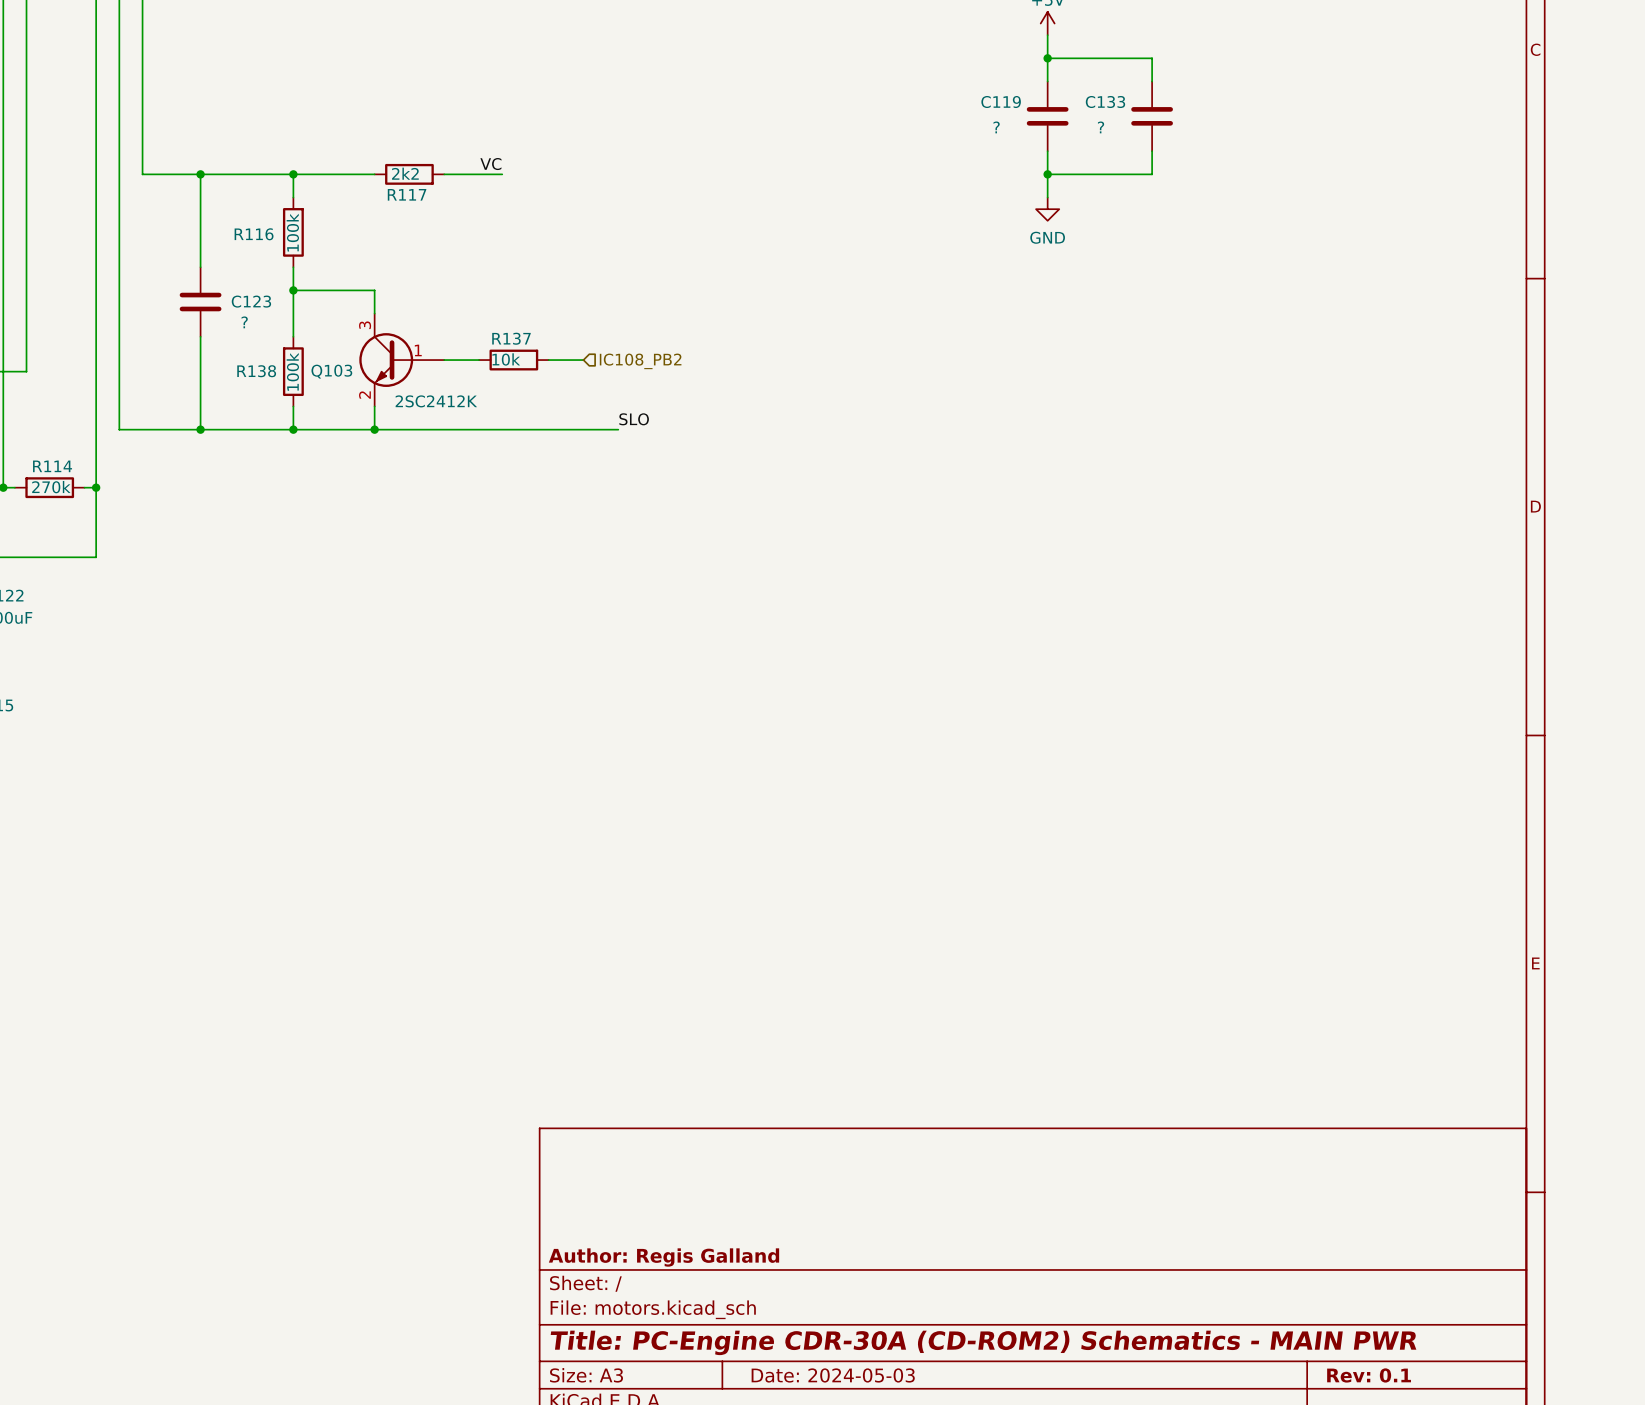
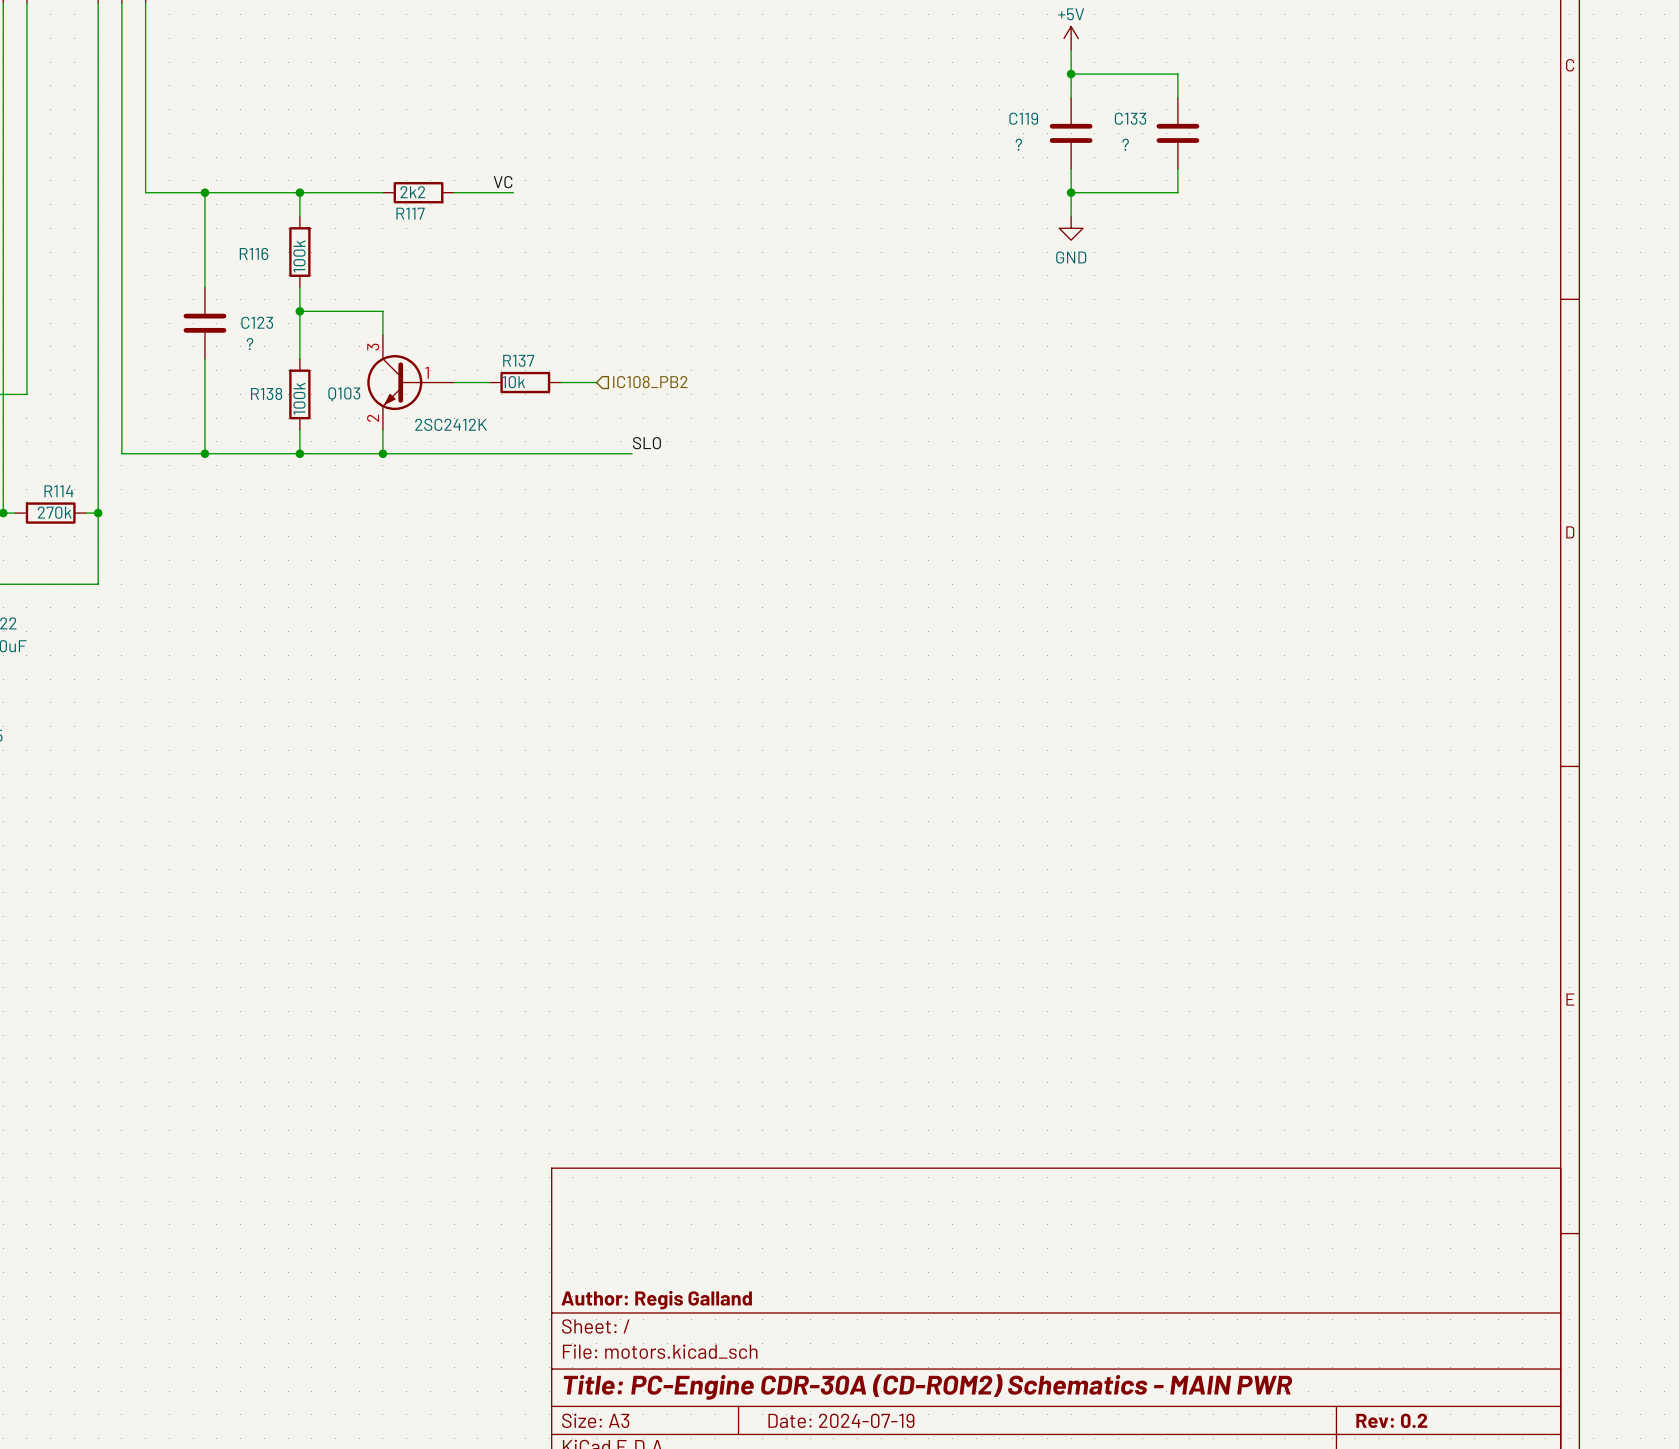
title block: Date: 2024-05-03 (833, 1375) -> Date: 2024-07-19 (841, 1420)
title block: Rev: 0.1 (1369, 1375) -> Rev: 0.2 (1391, 1420)

